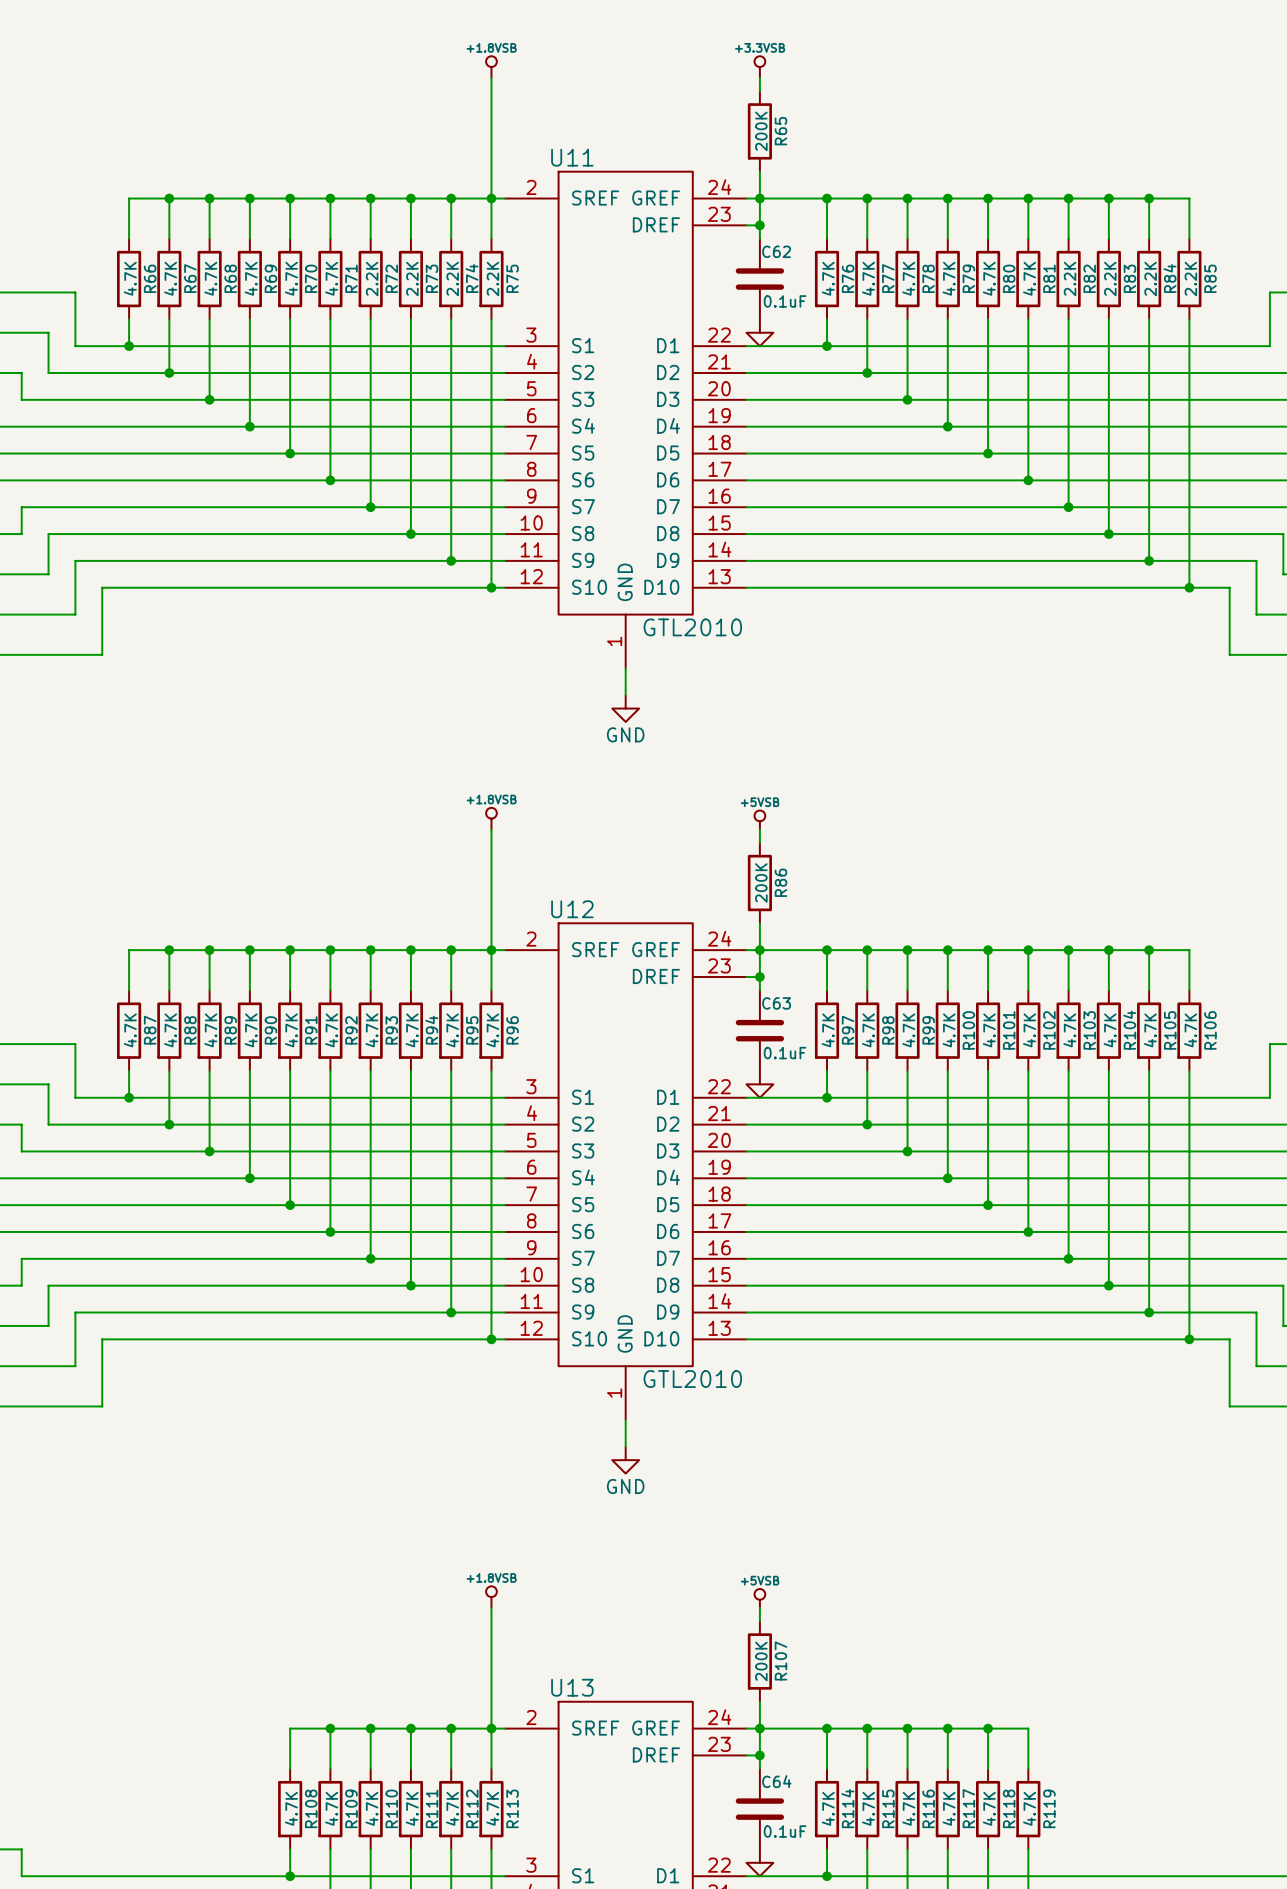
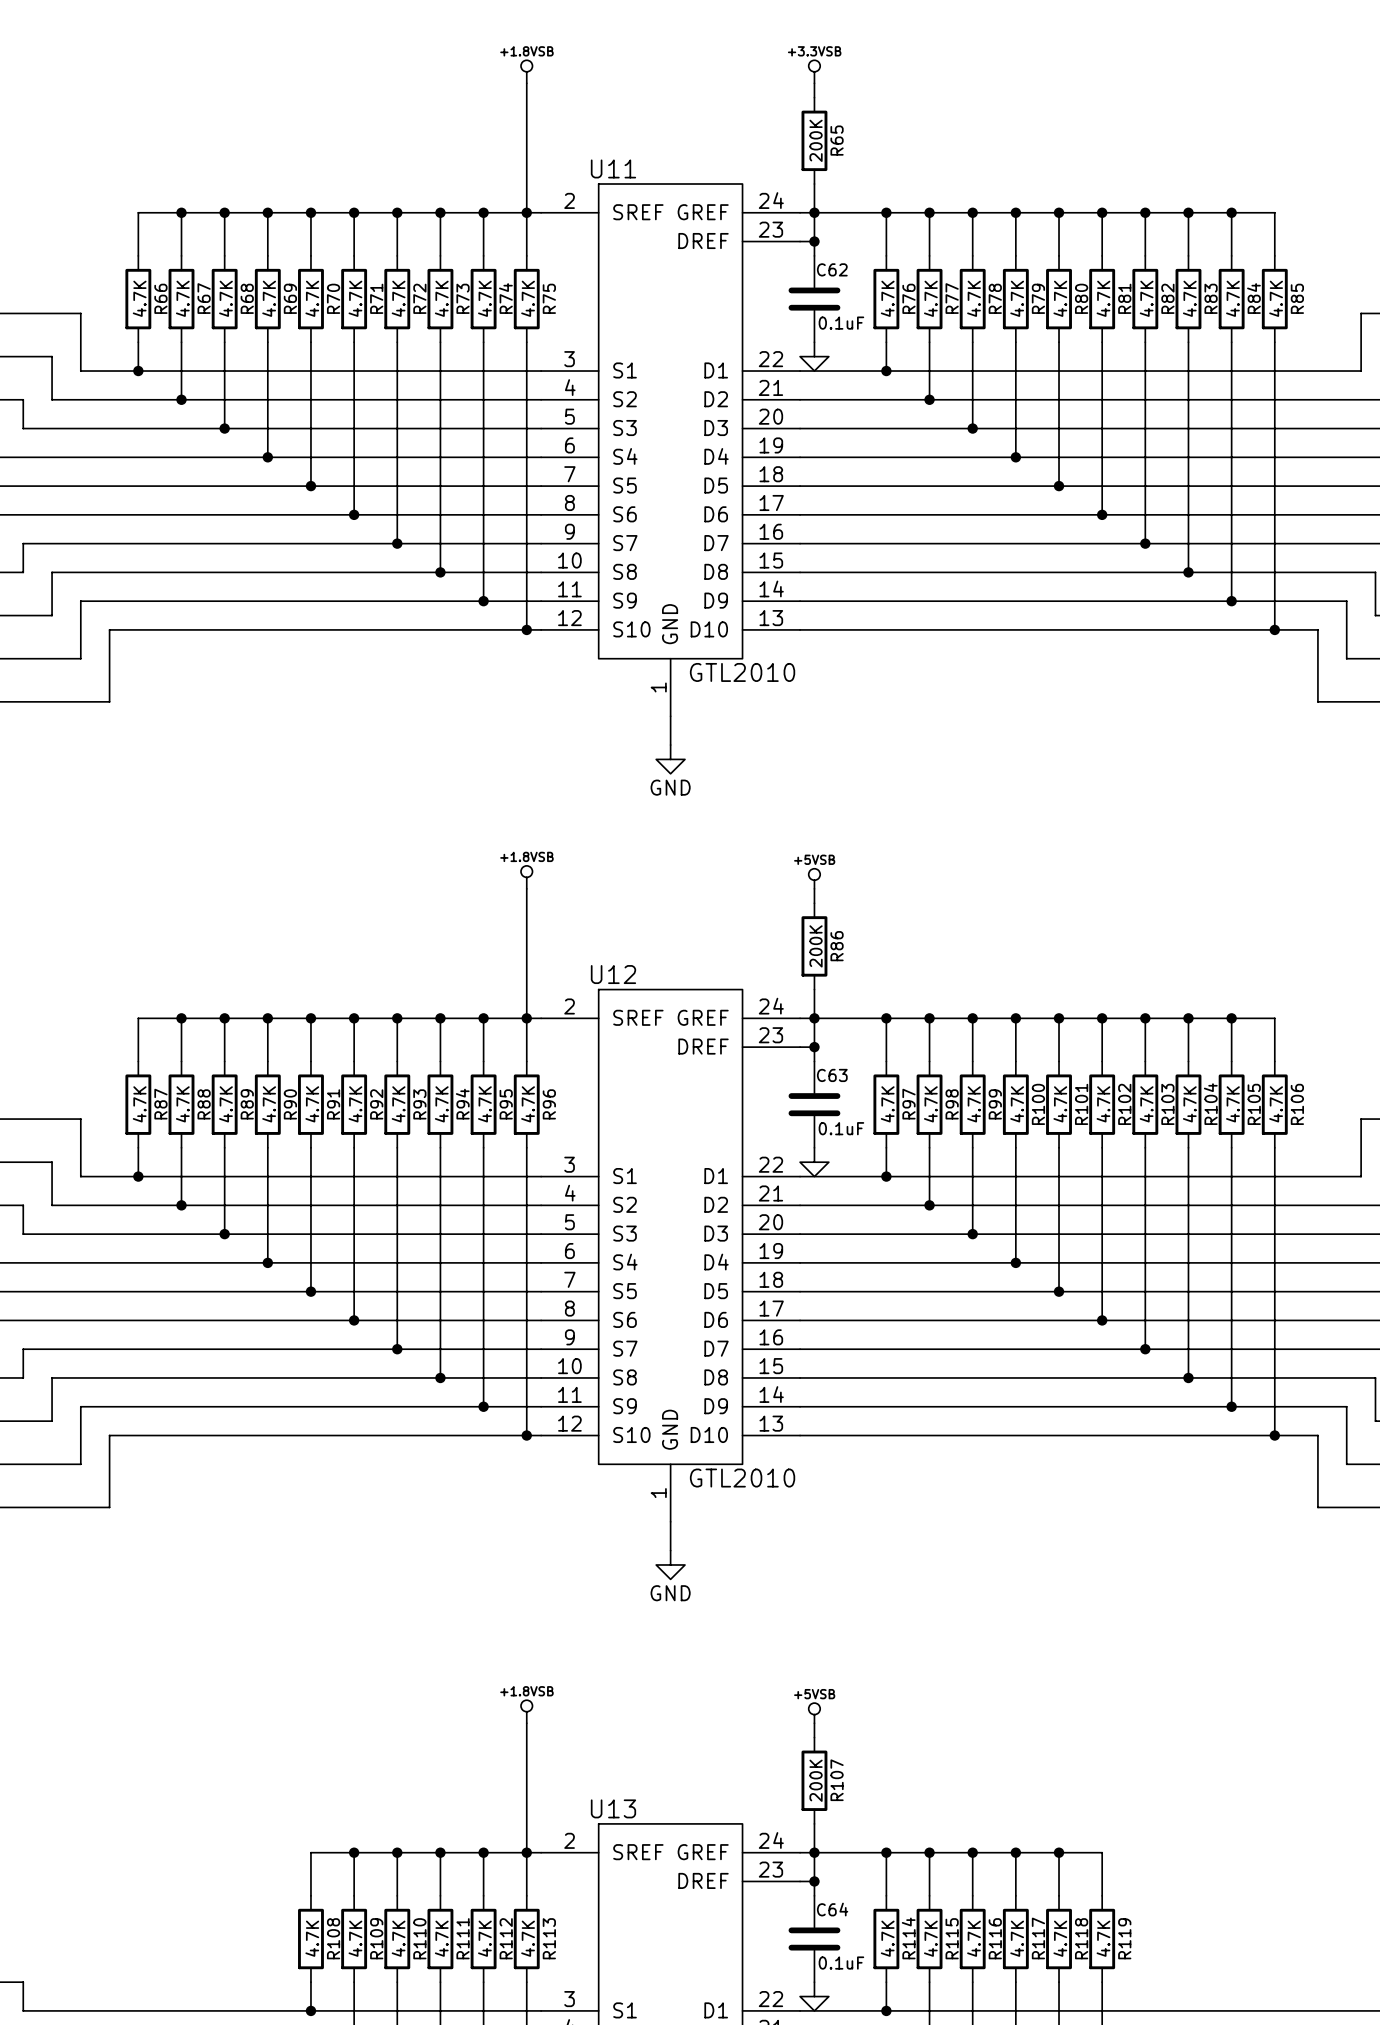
R72 value: 2.2K (372, 279) -> 4.7K (398, 298)
R73 value: 2.2K (412, 279) -> 4.7K (441, 298)
R74 value: 2.2K (452, 279) -> 4.7K (484, 298)
R75 value: 2.2K (492, 279) -> 4.7K (528, 298)
R82 value: 2.2K (1070, 279) -> 4.7K (1146, 298)
R83 value: 2.2K (1110, 279) -> 4.7K (1189, 298)
R84 value: 2.2K (1150, 279) -> 4.7K (1232, 298)
R85 value: 2.2K (1190, 279) -> 4.7K (1276, 298)

